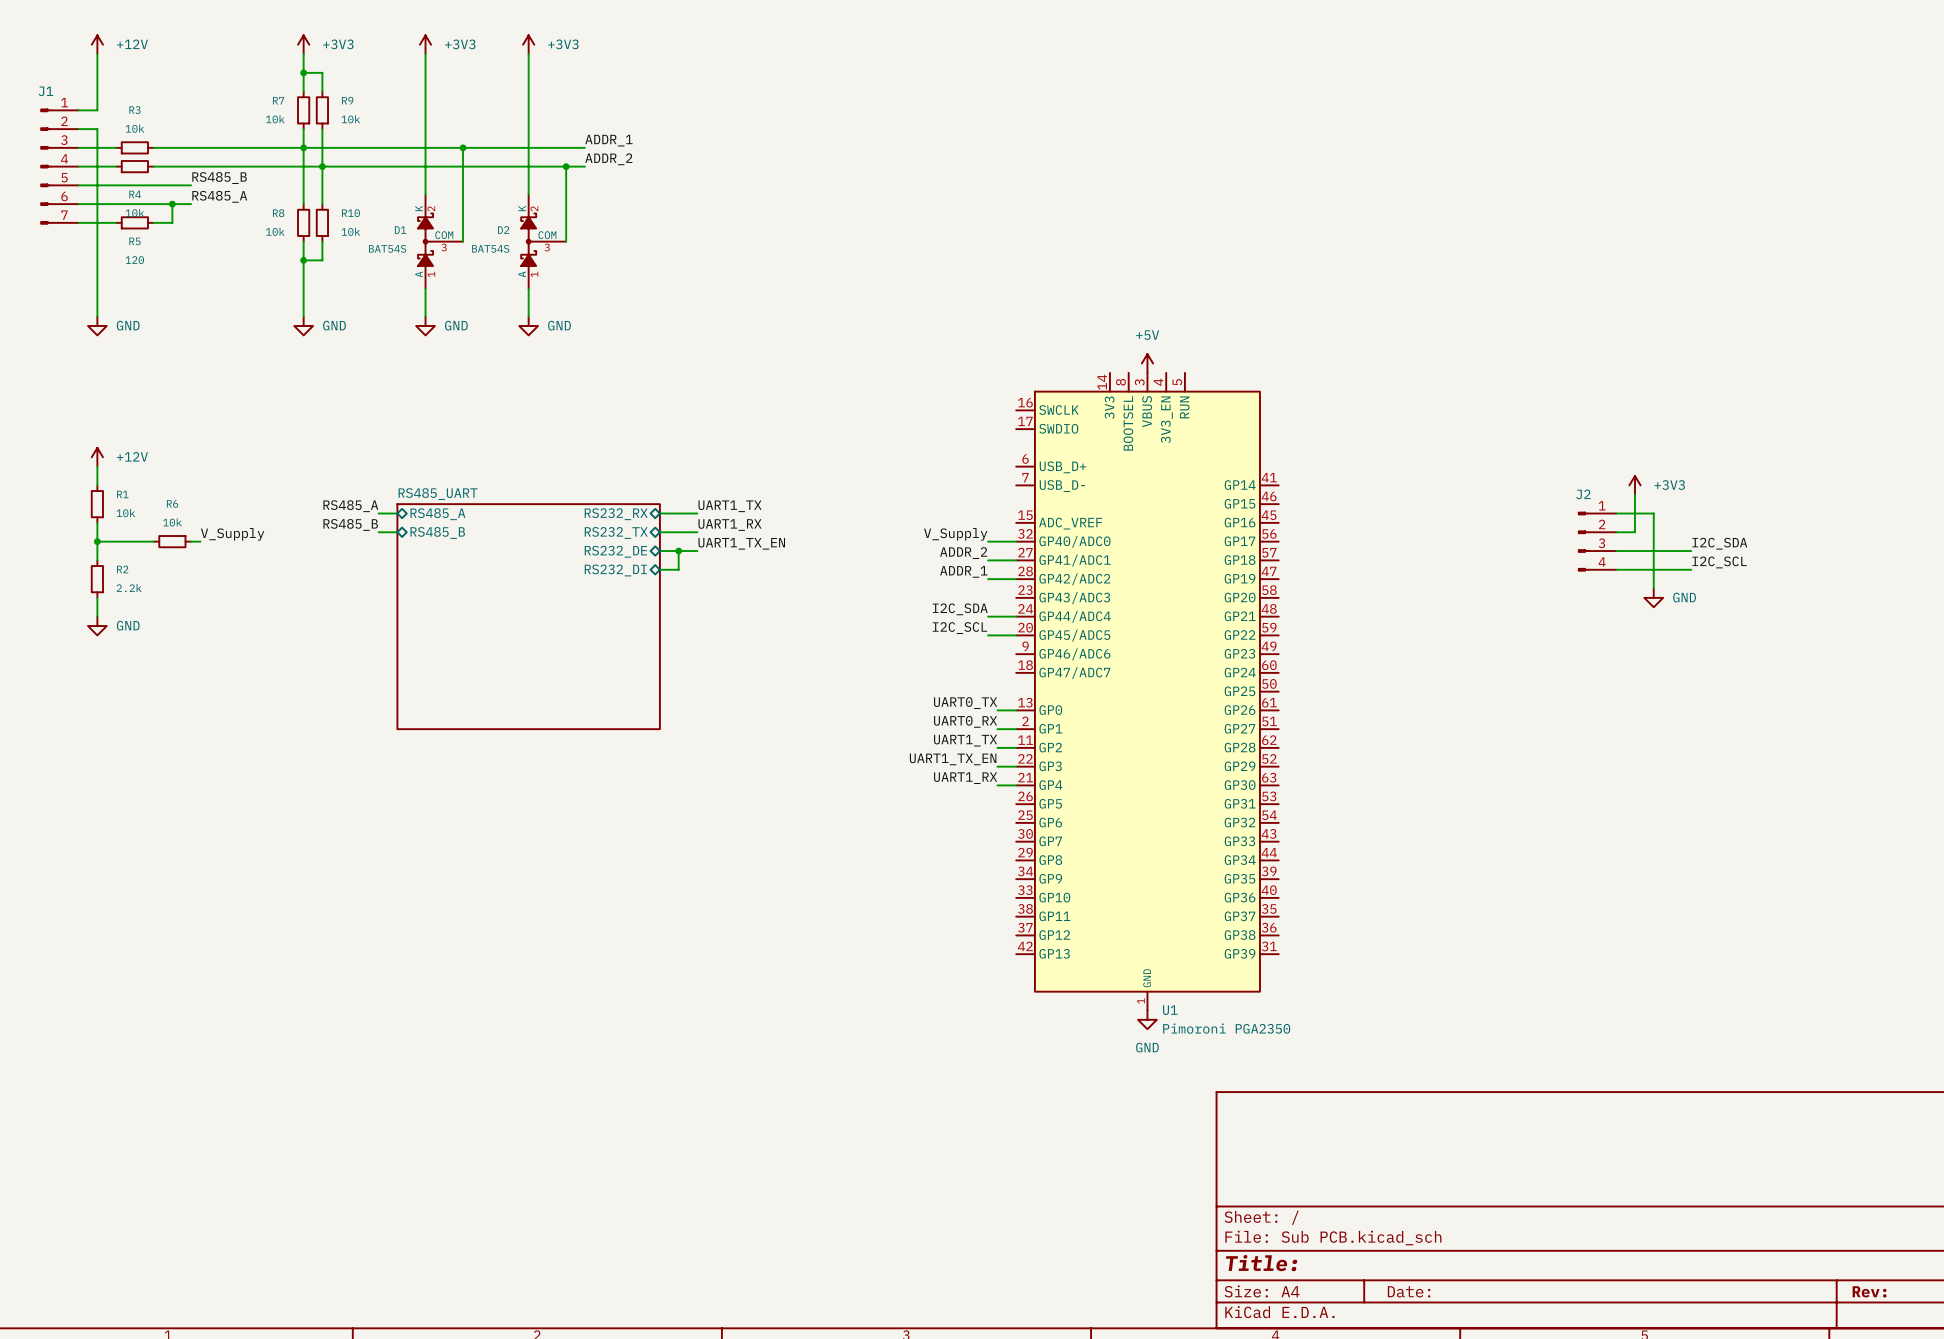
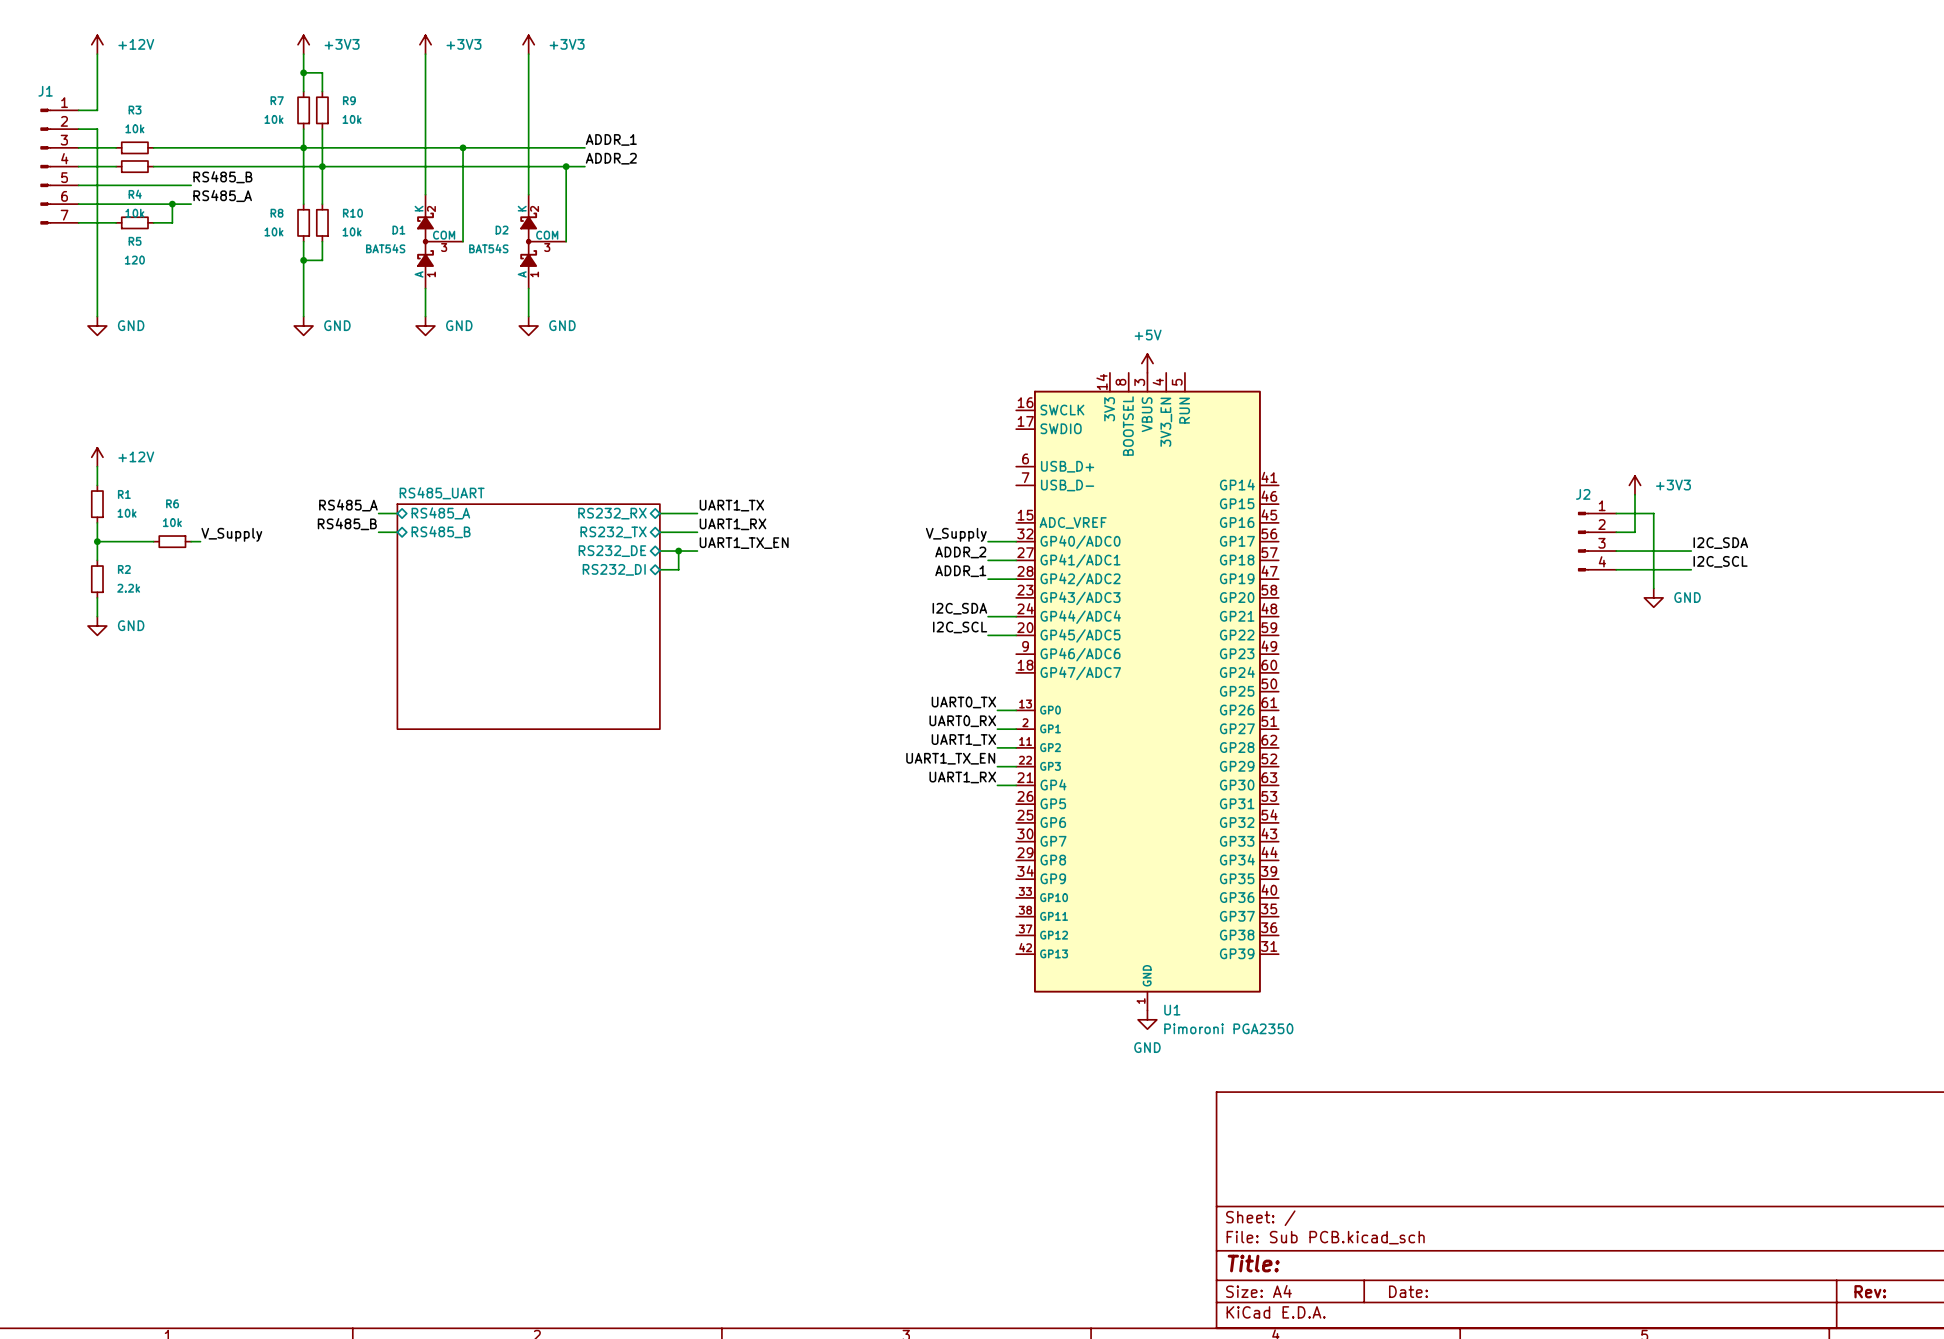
U1 symbol: [1016, 372, 1279, 1011] -> [1016, 372, 1279, 1011]

